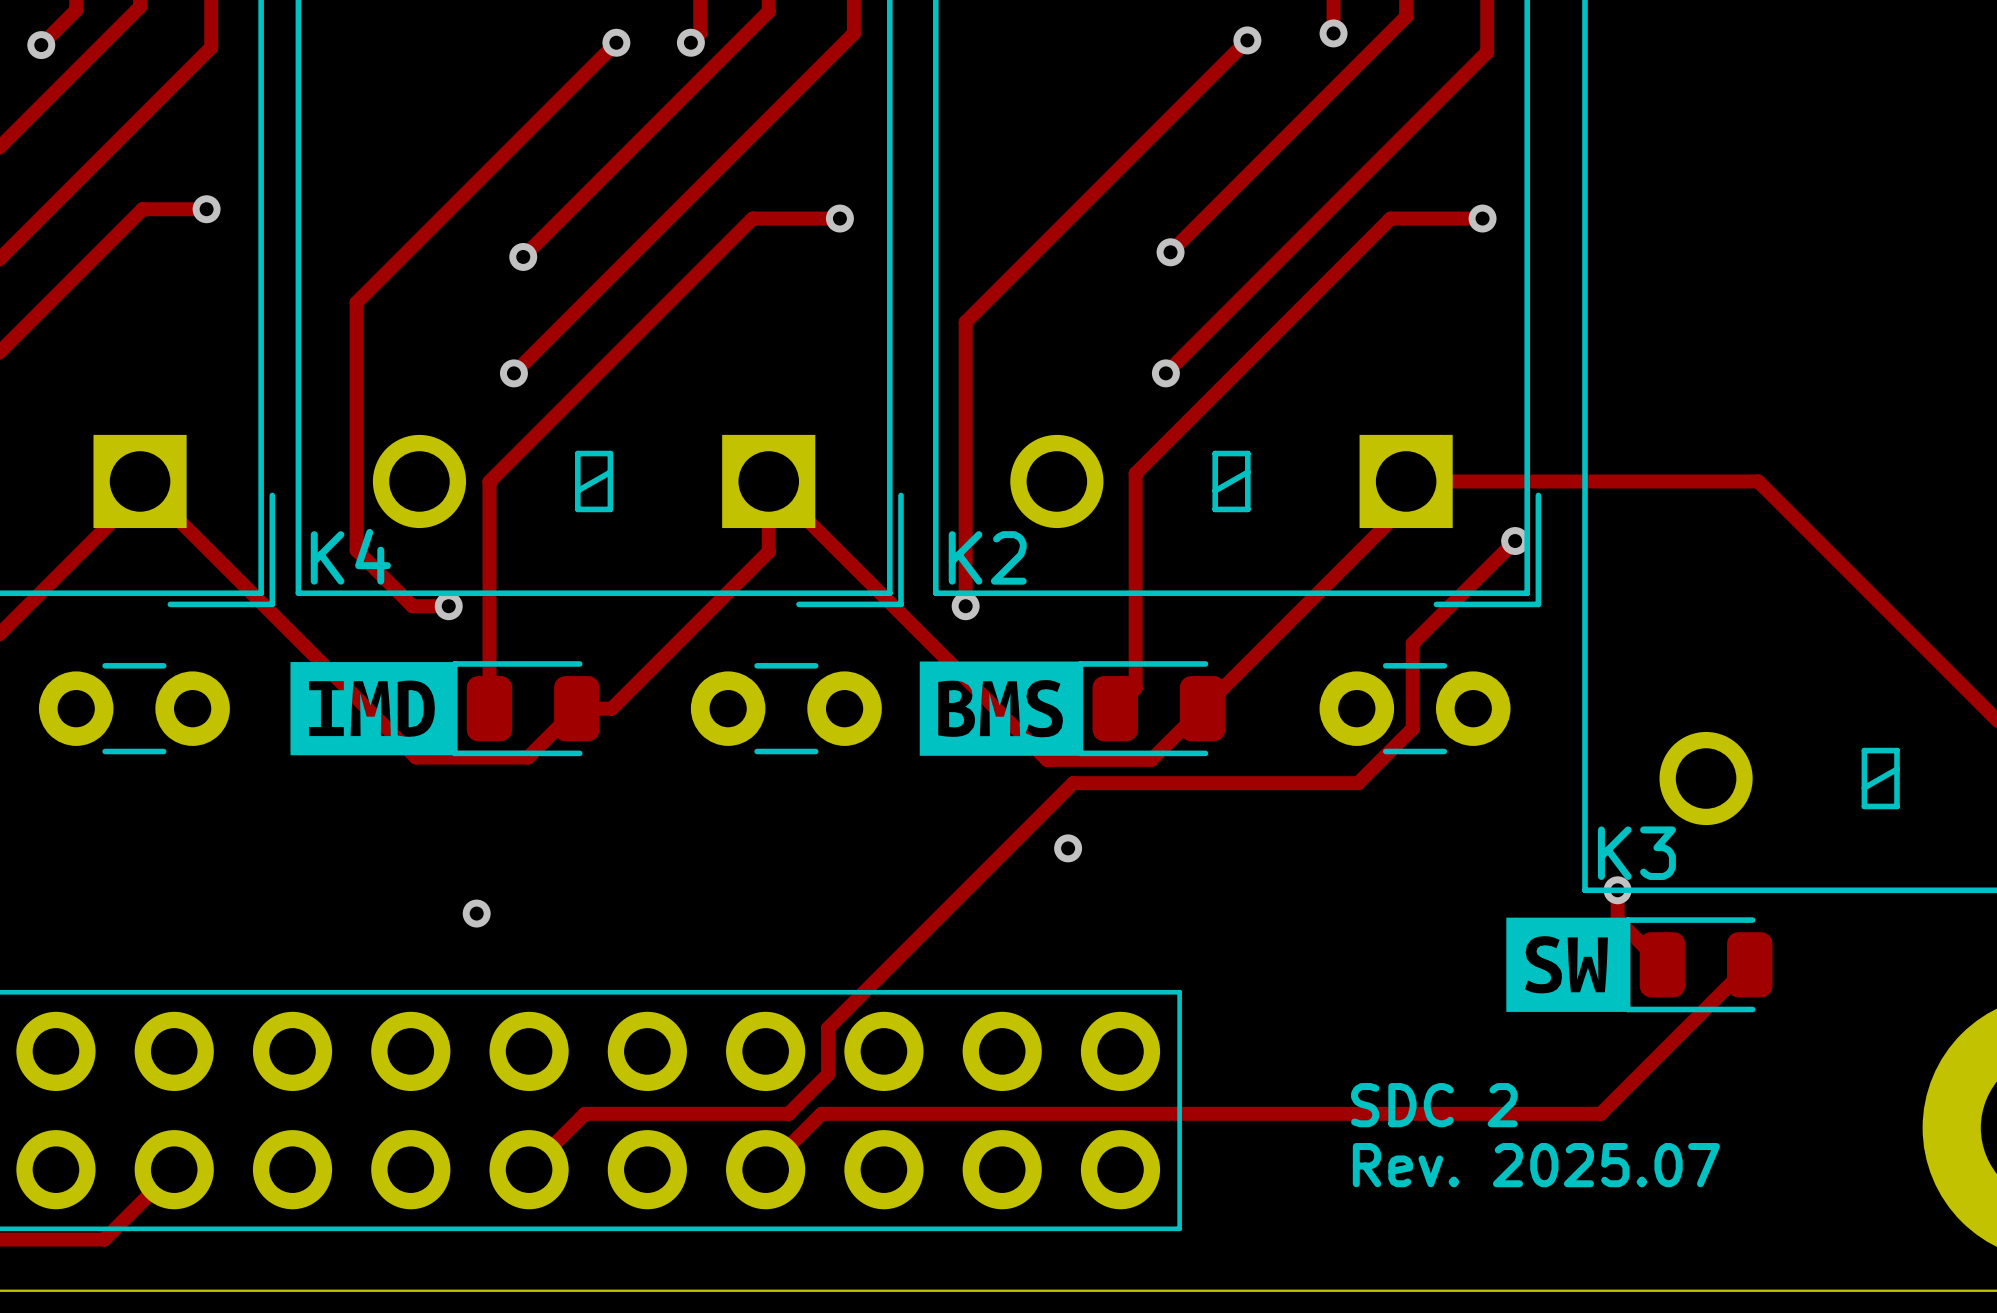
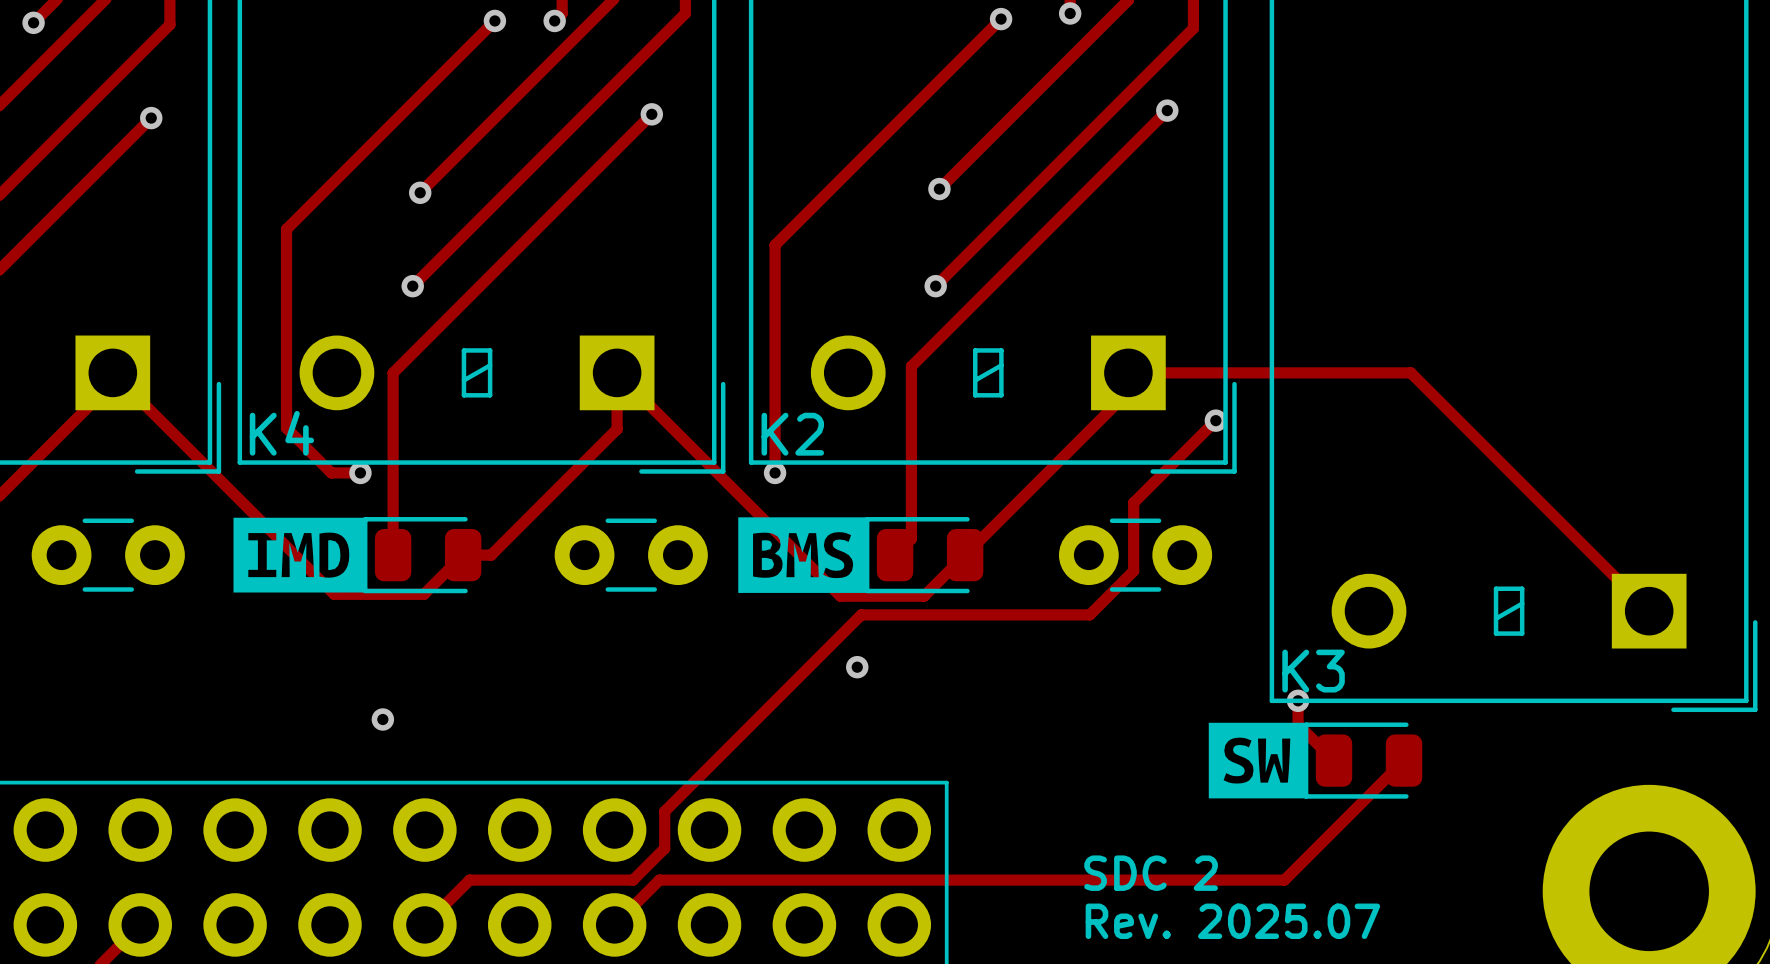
track: (142, 209) (206, 209) -> (114, 154) (151, 118)
via position: (206, 209) -> (151, 118)
track: (752, 218) (839, 218) -> (604, 161) (651, 114)
via position: (839, 218) -> (651, 114)
track: (1390, 218) (1482, 218) -> (1115, 161) (1167, 110)
via position: (1482, 218) -> (1167, 110)

